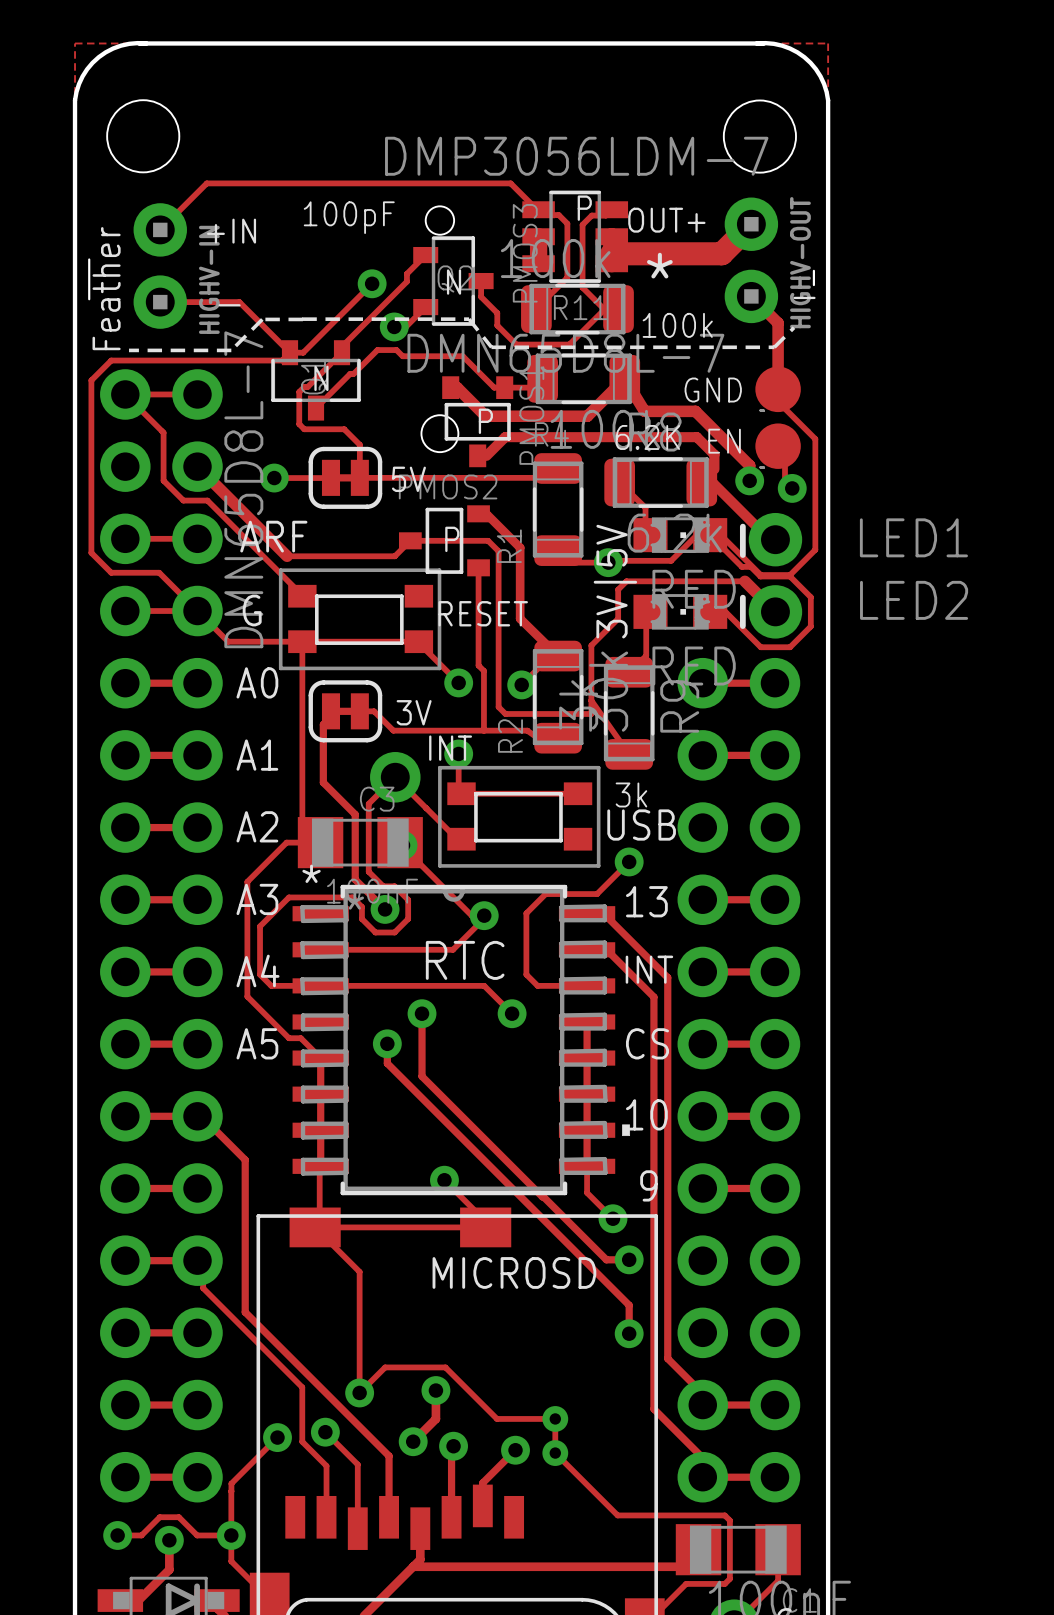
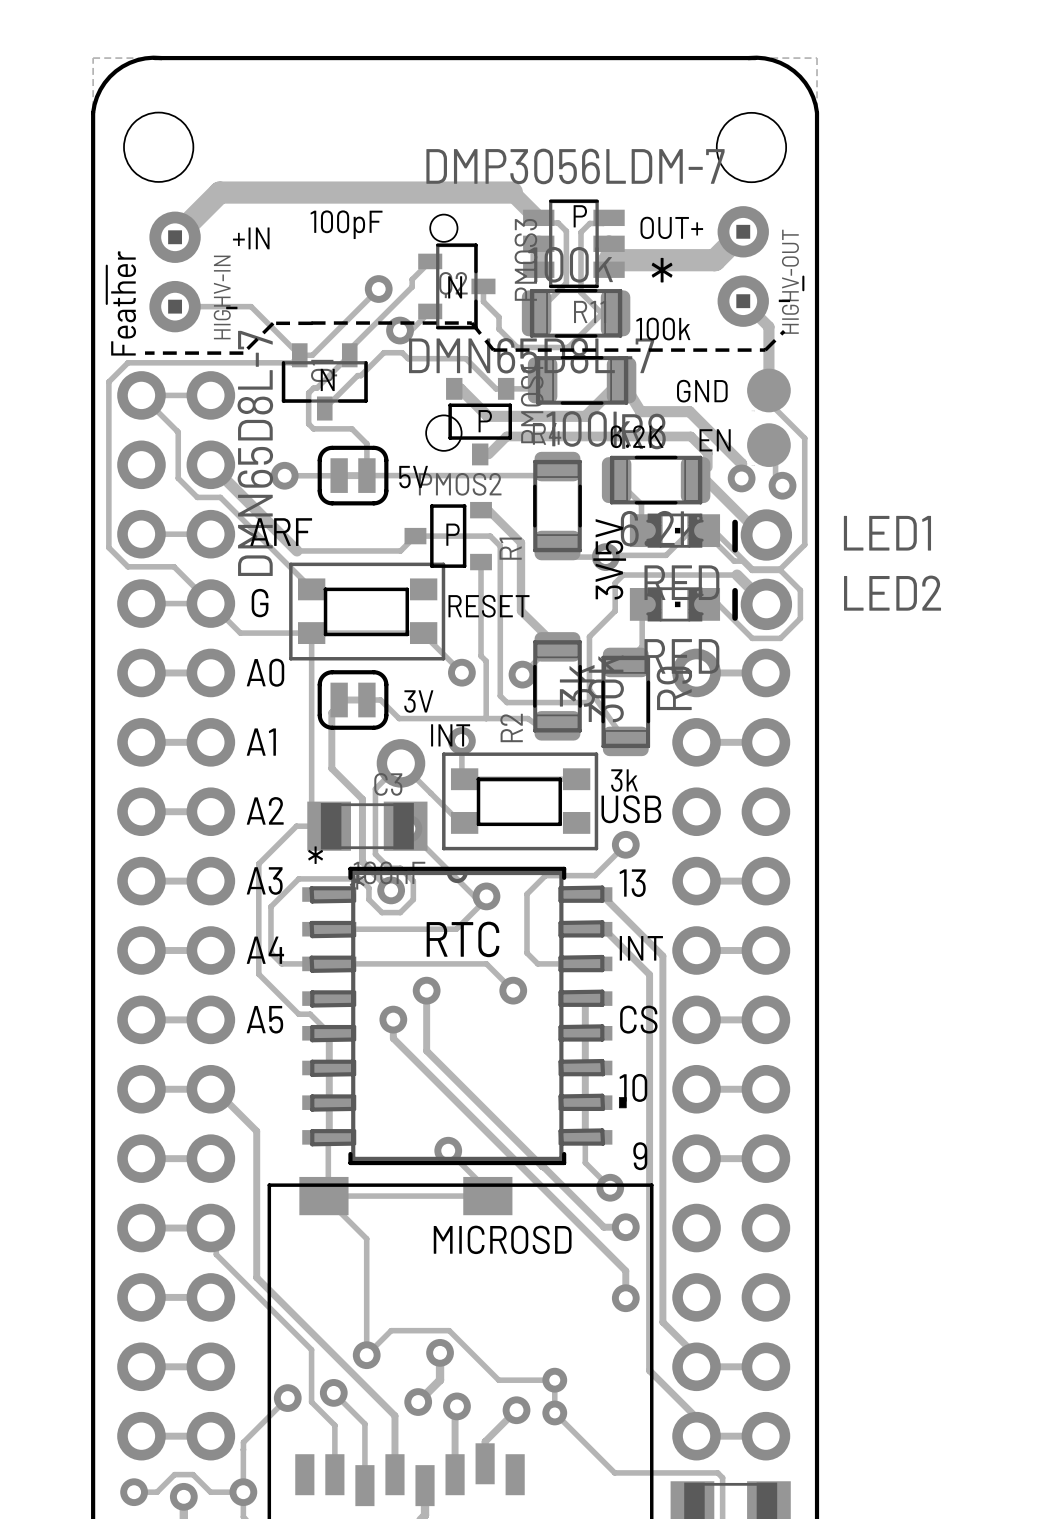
track width: thin (537, 209) (510, 183) (206, 183) (160, 229) -> thick (537, 217) (511, 192) (219, 192) (175, 237)

